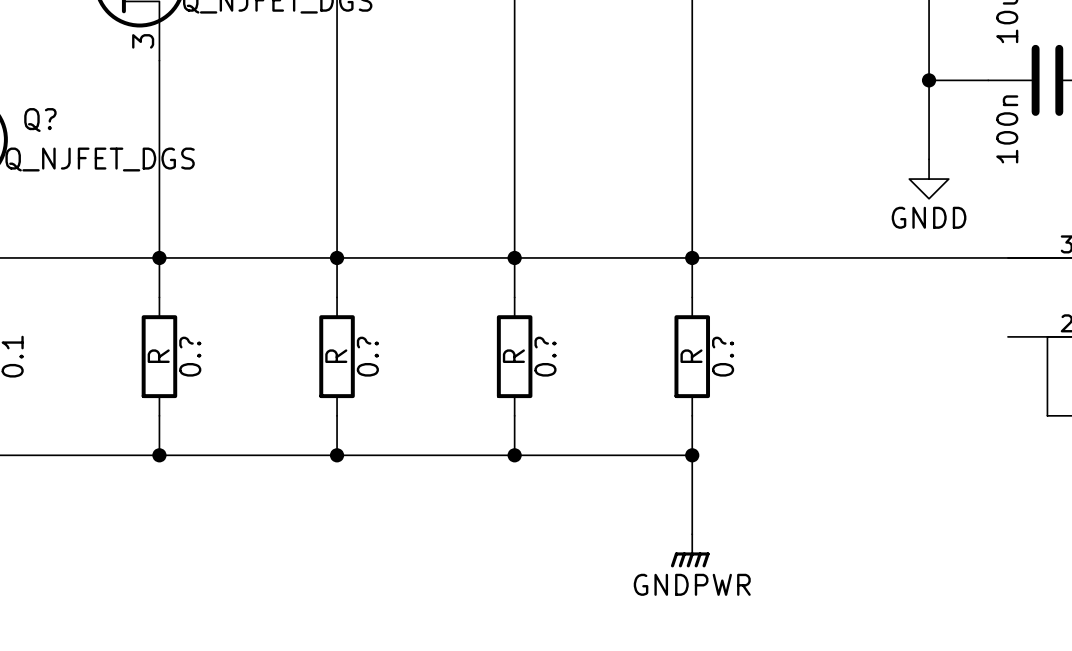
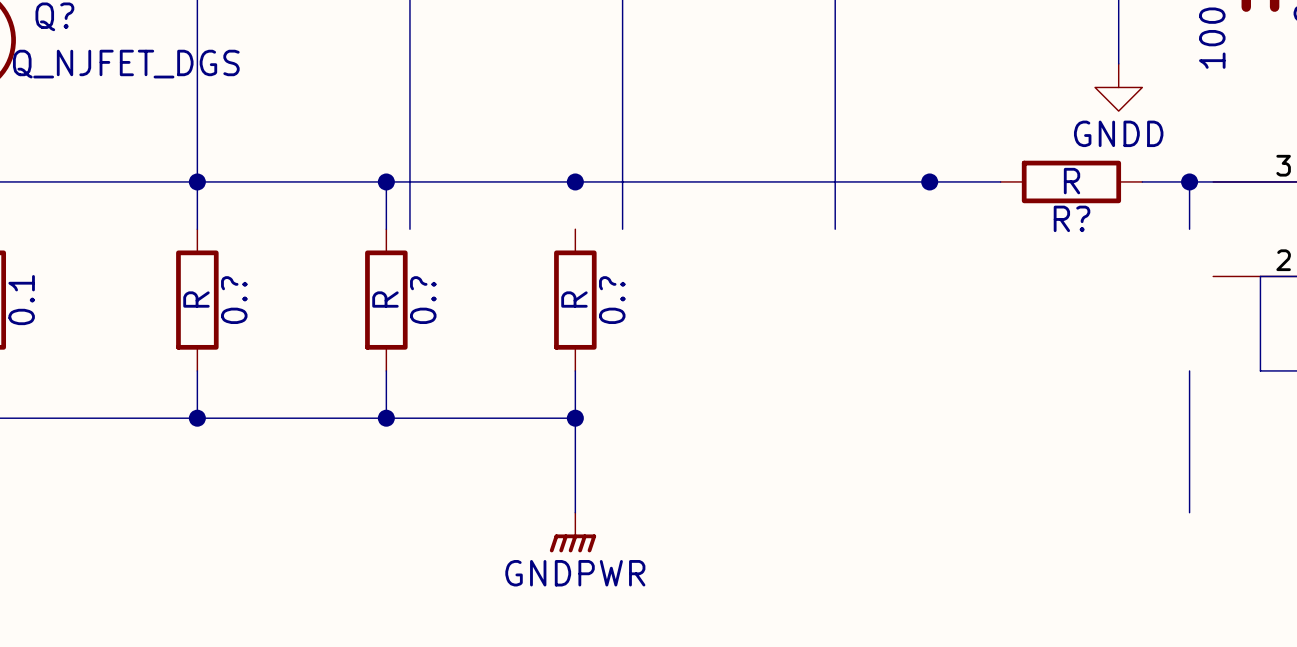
junction position: (337, 257) -> (386, 181)
junction position: (514, 257) -> (575, 181)
junction position: (692, 257) -> (929, 181)
wire: (830, 257) (948, 257) -> none
R?: none -> R (1071, 181)
wire: none -> (1189, 181) (1189, 229)
junction: none -> (1189, 181)
0.? position: (337, 356) -> (386, 300)
0.? position: (514, 356) -> (575, 300)
0.?: R (692, 356) -> none
wire: (337, 415) (337, 455) -> (386, 370) (386, 418)
wire: (514, 415) (514, 455) -> (386, 181) (386, 229)
wire: (692, 415) (692, 534) -> (575, 370) (575, 512)
wire: none -> (1189, 370) (1189, 512)
junction position: (337, 455) -> (386, 418)
wire: (475, 455) (692, 455) -> none
junction position: (514, 455) -> (575, 418)
junction: (692, 455) -> none
power symbol position: GNDPWR (690, 550) -> GNDPWR (572, 532)

